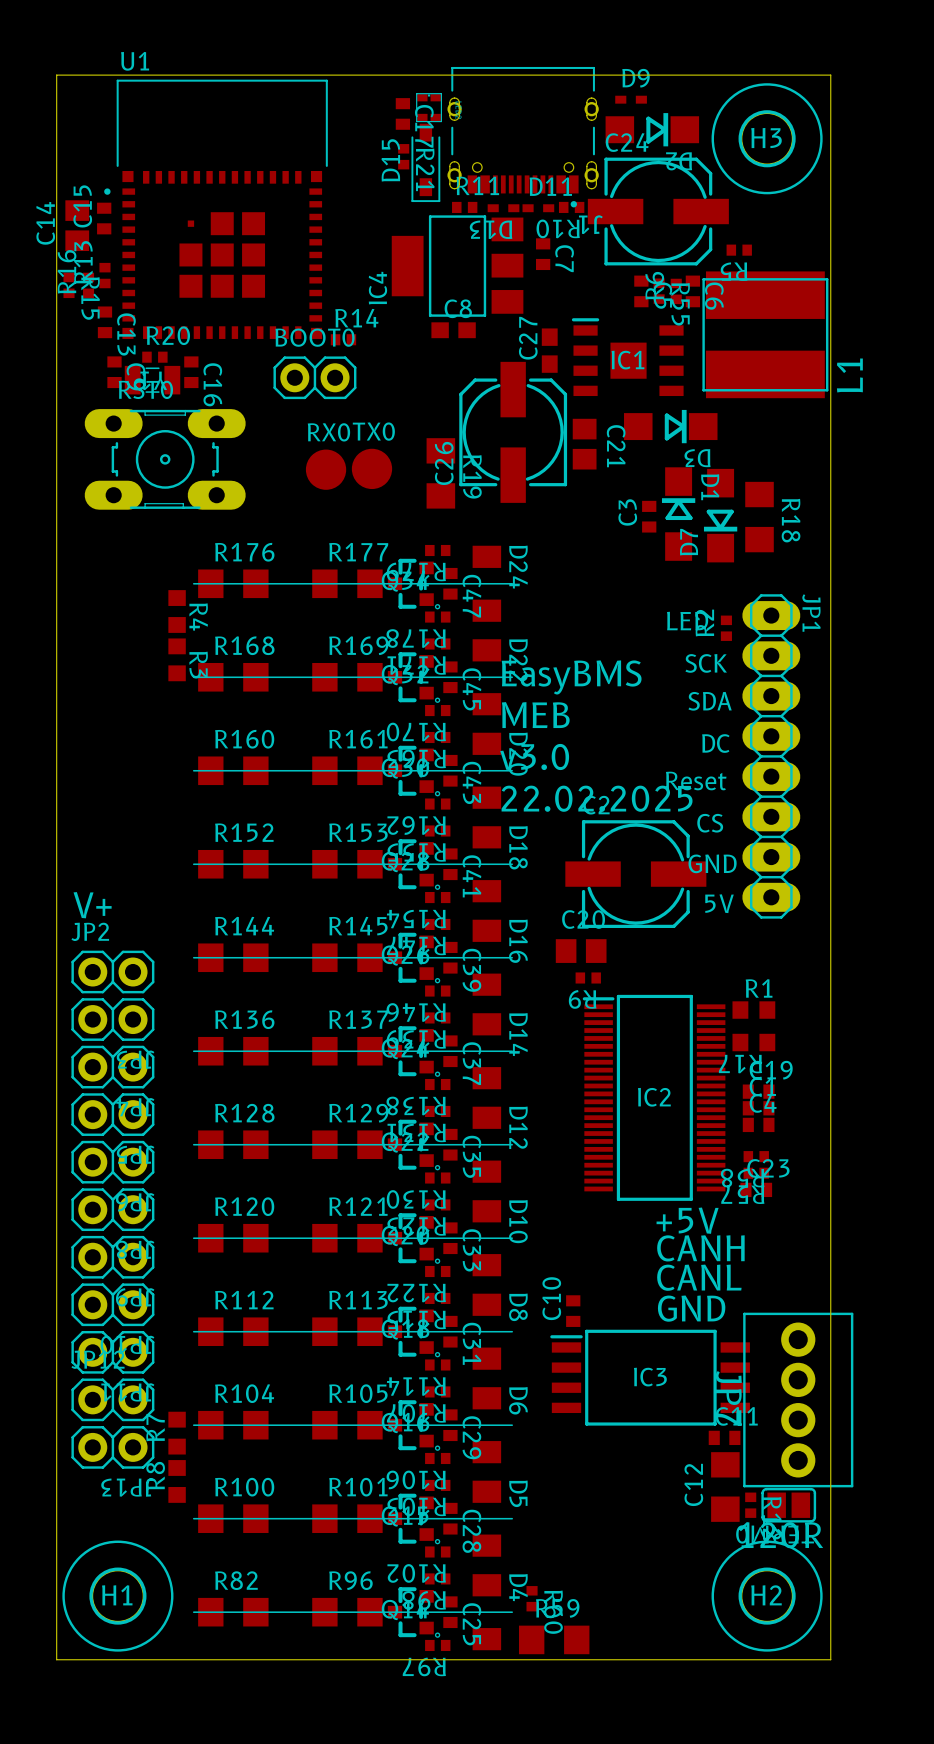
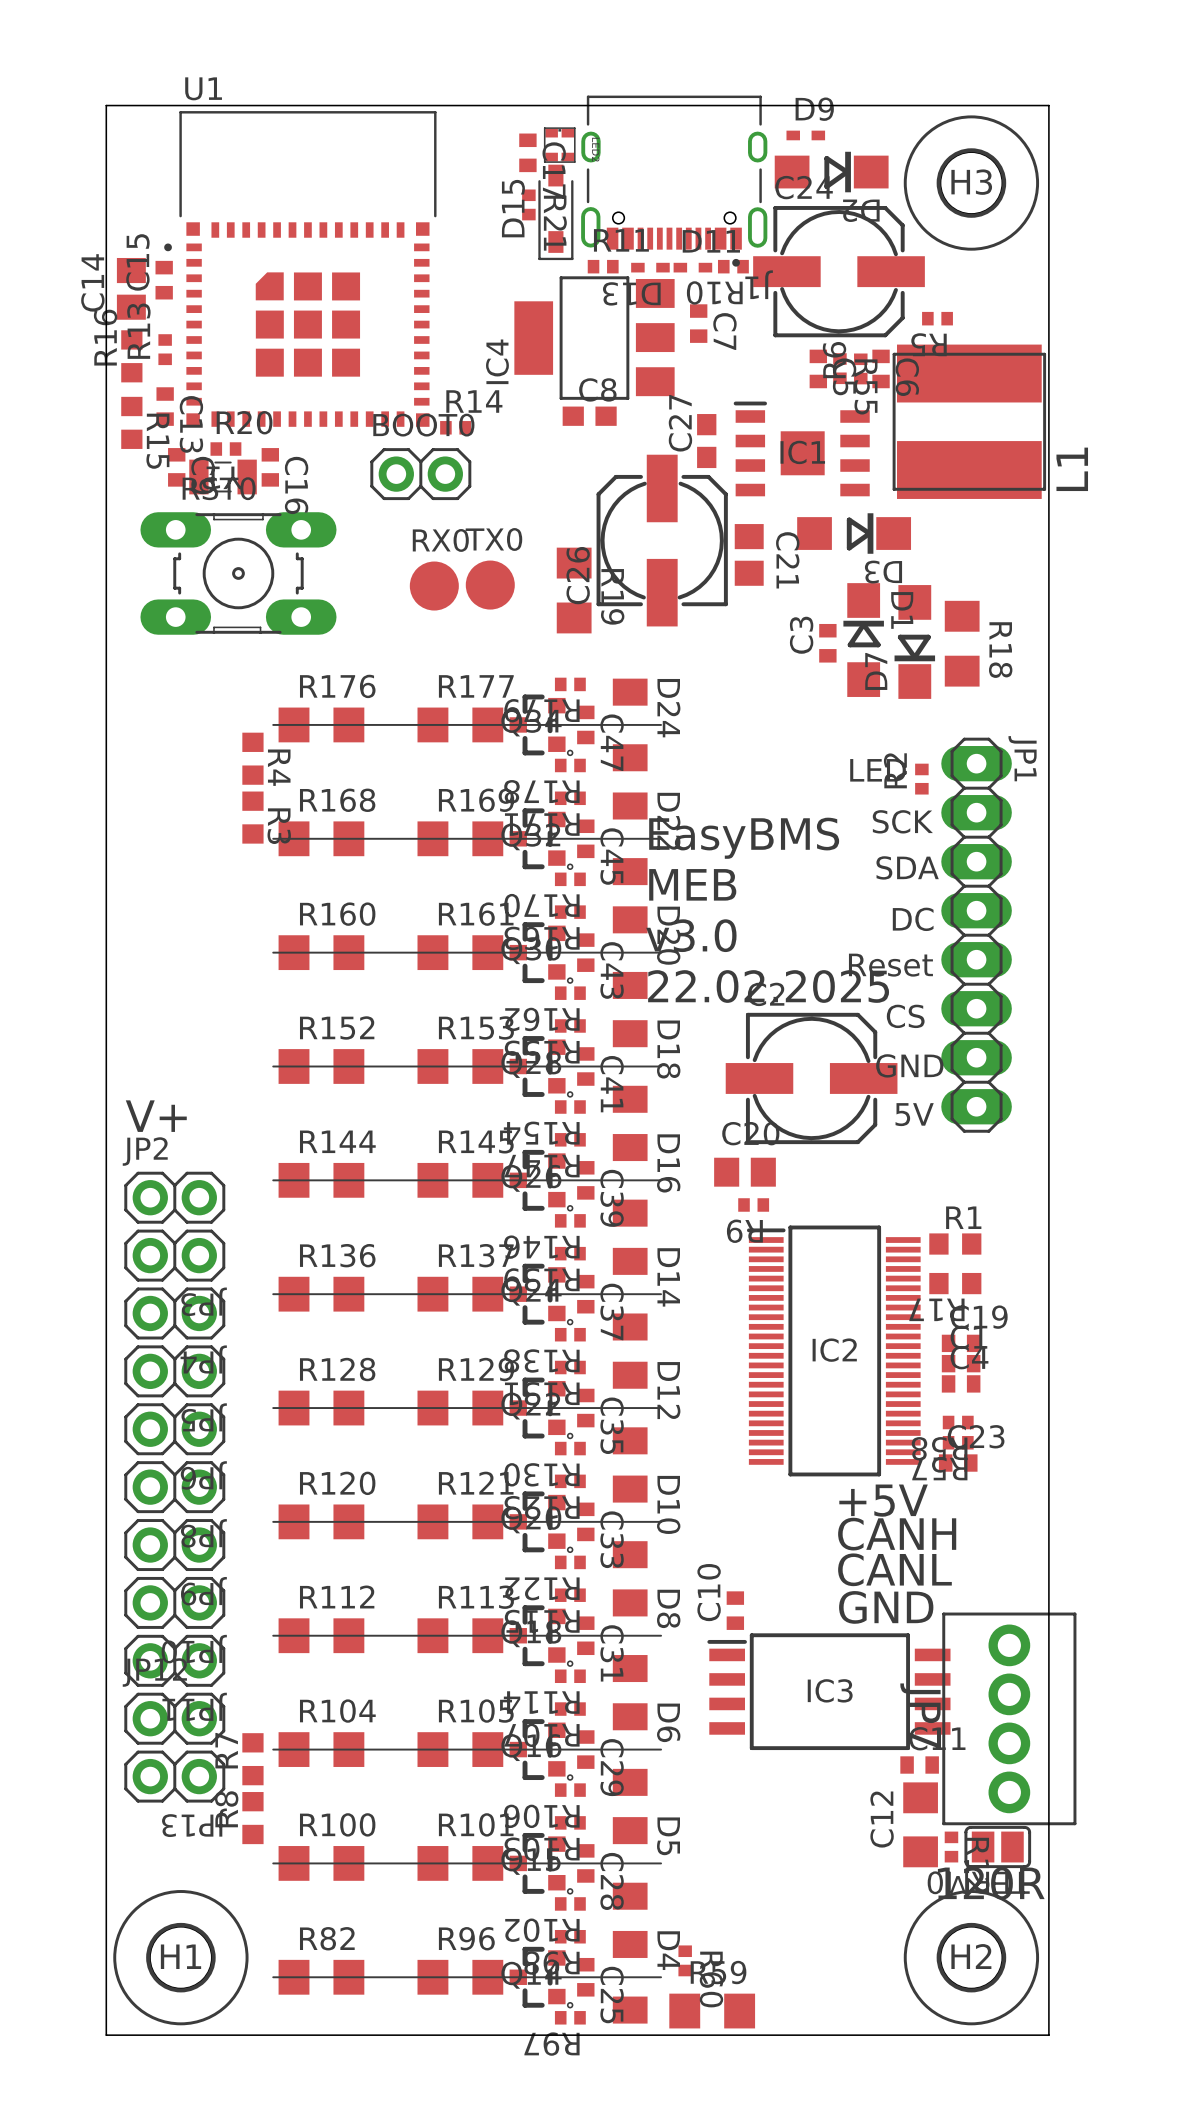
J1 footprint: [447, 66, 599, 208] -> [581, 95, 768, 267]
U1 footprint: [104, 79, 328, 339] -> [164, 111, 437, 427]
R15 footprint: [63, 272, 75, 299] -> [121, 396, 143, 449]
R16 footprint: [82, 272, 95, 299] -> [121, 330, 143, 383]

